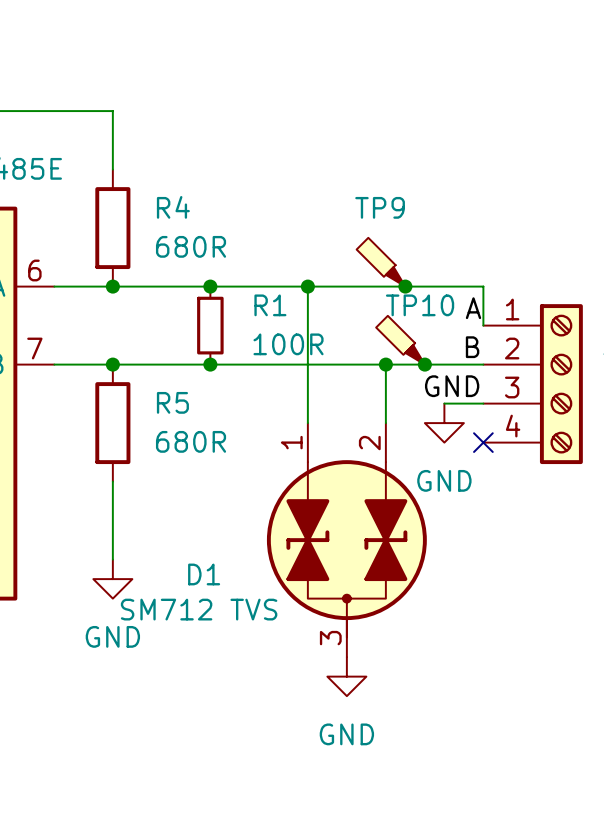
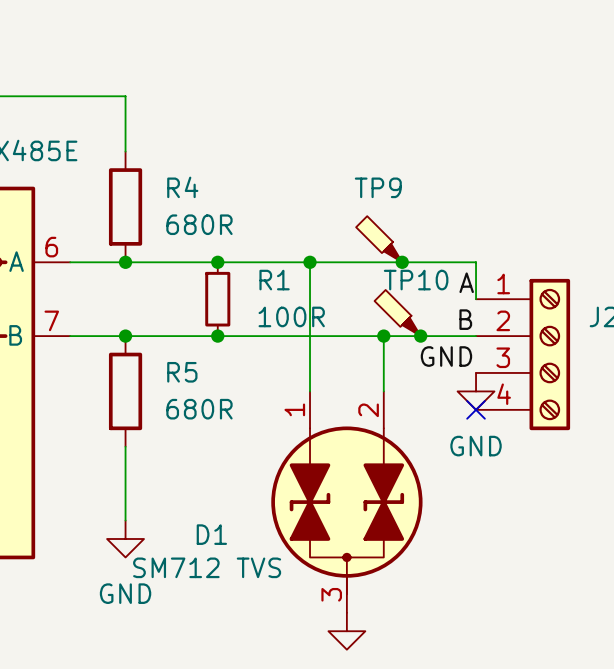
wire: (444, 403) (483, 403) -> none
power symbol position: GND (444, 423) -> GND (476, 391)

